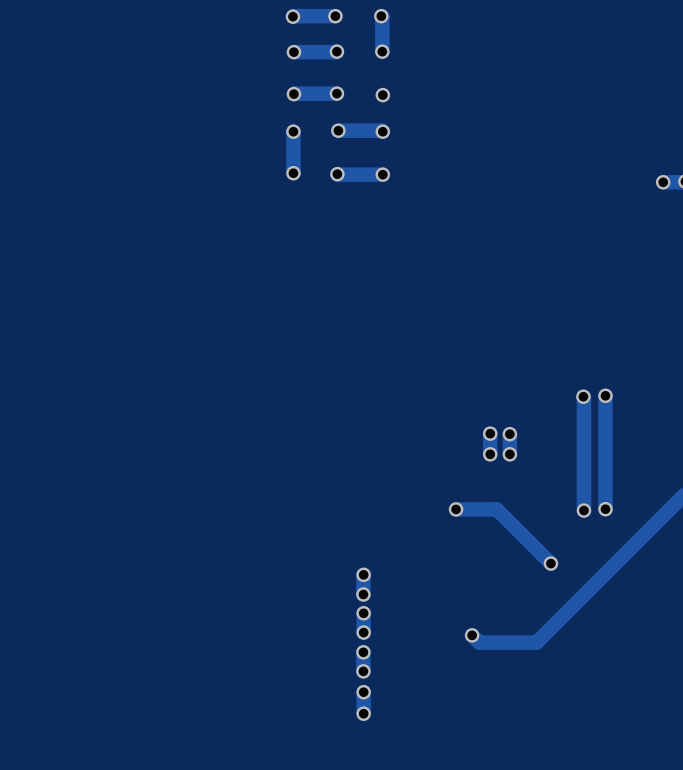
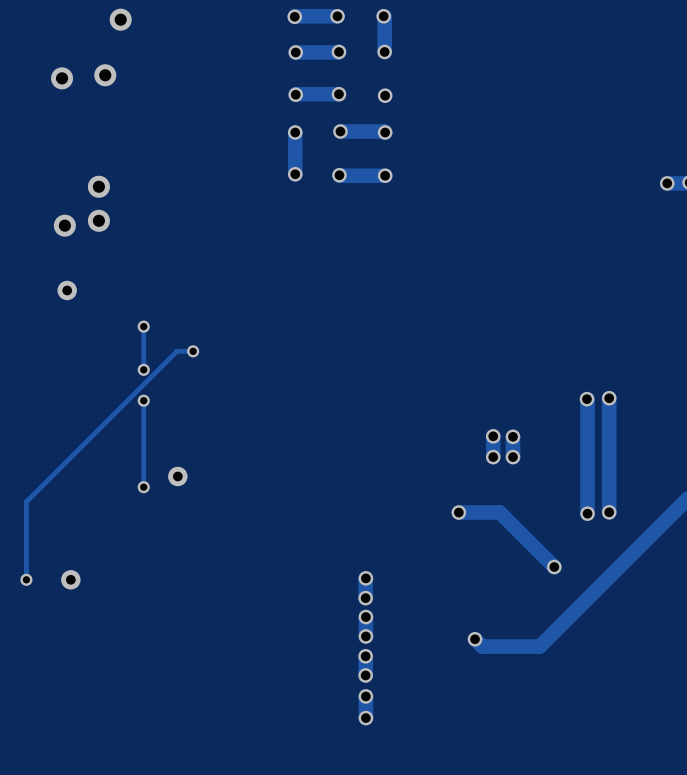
via: none -> (120, 19)
via: none -> (105, 75)
via: none -> (62, 78)
via: none -> (98, 186)
via: none -> (98, 220)
via: none -> (64, 225)
via: none -> (67, 290)
track: none -> (143, 326) (143, 369)
via: none -> (143, 326)
track: none -> (193, 351) (176, 351) (26, 501) (26, 579)
via: none -> (193, 351)
via: none -> (143, 369)
track: none -> (143, 400) (143, 487)
via: none -> (143, 400)
via: none -> (177, 476)
via: none -> (143, 487)
via: none -> (26, 579)
via: none -> (70, 579)

